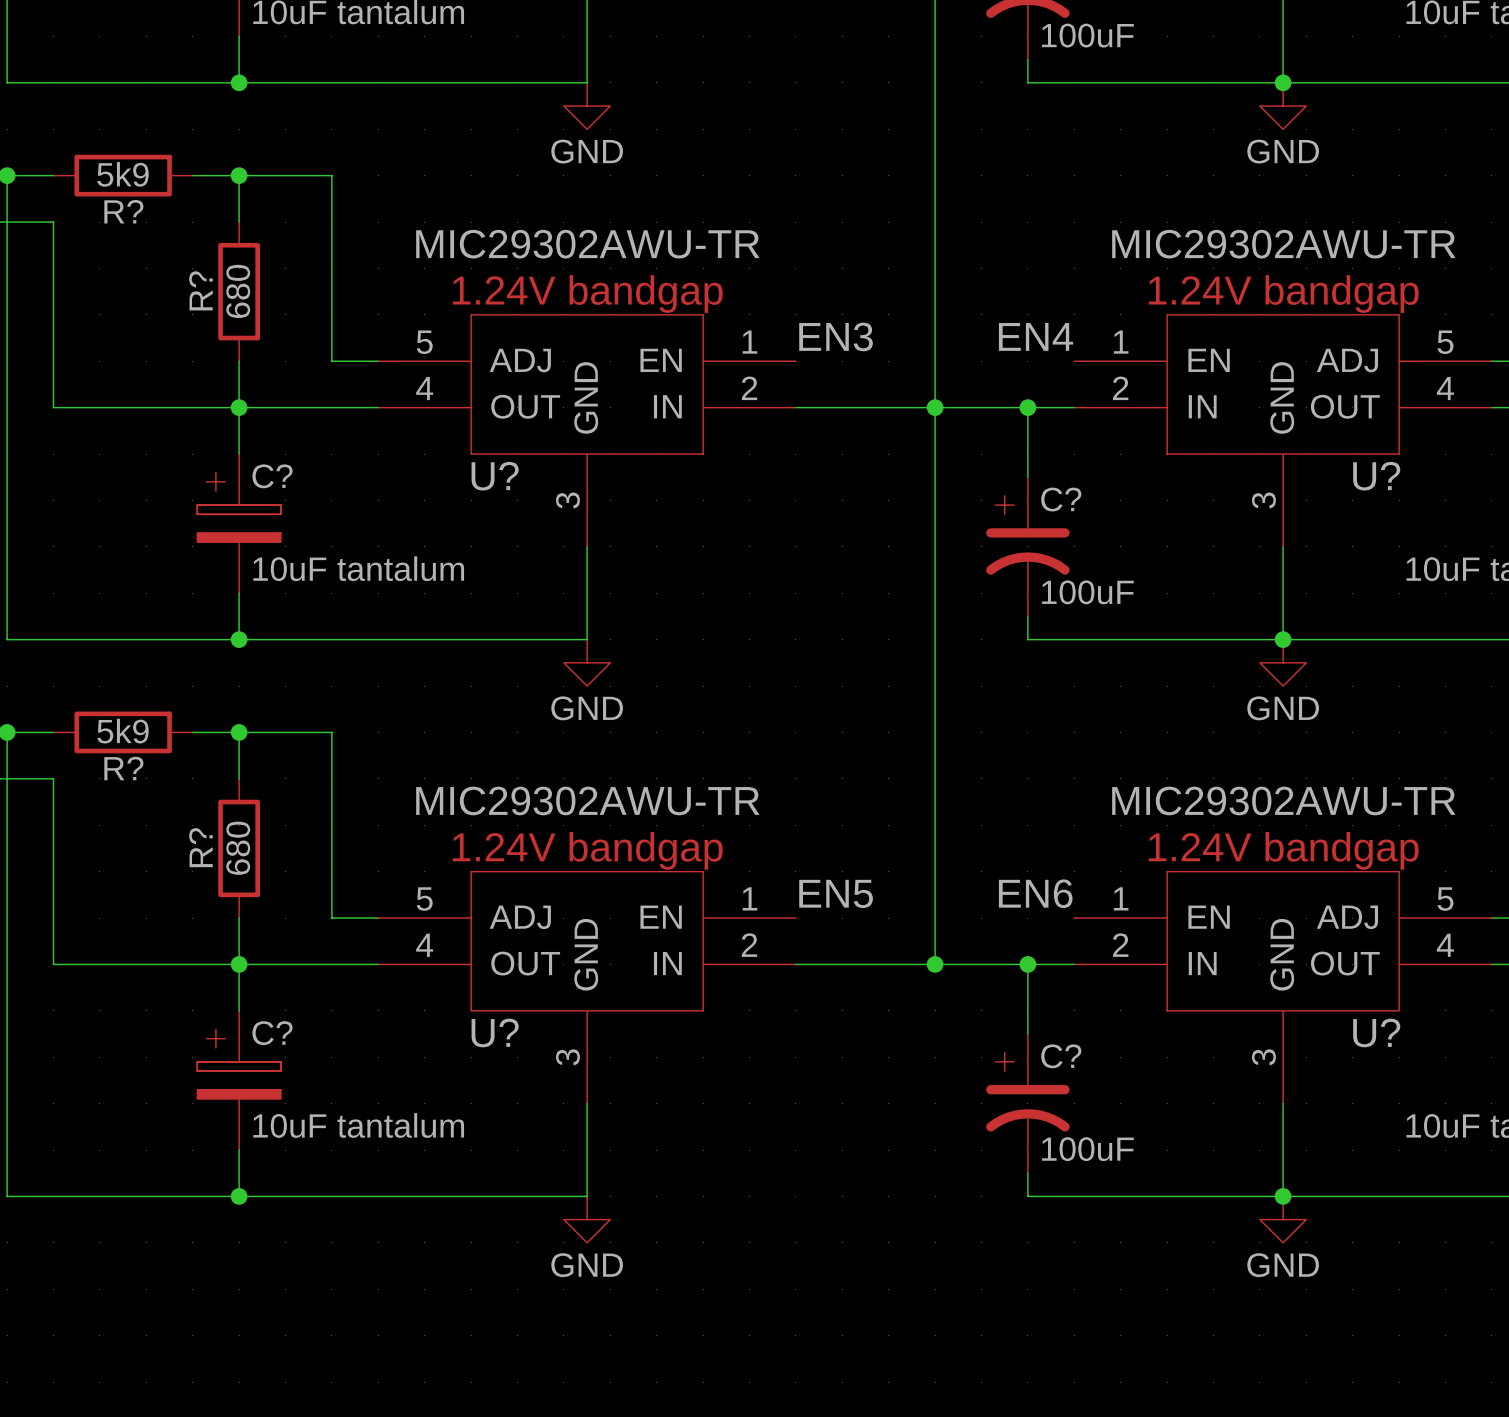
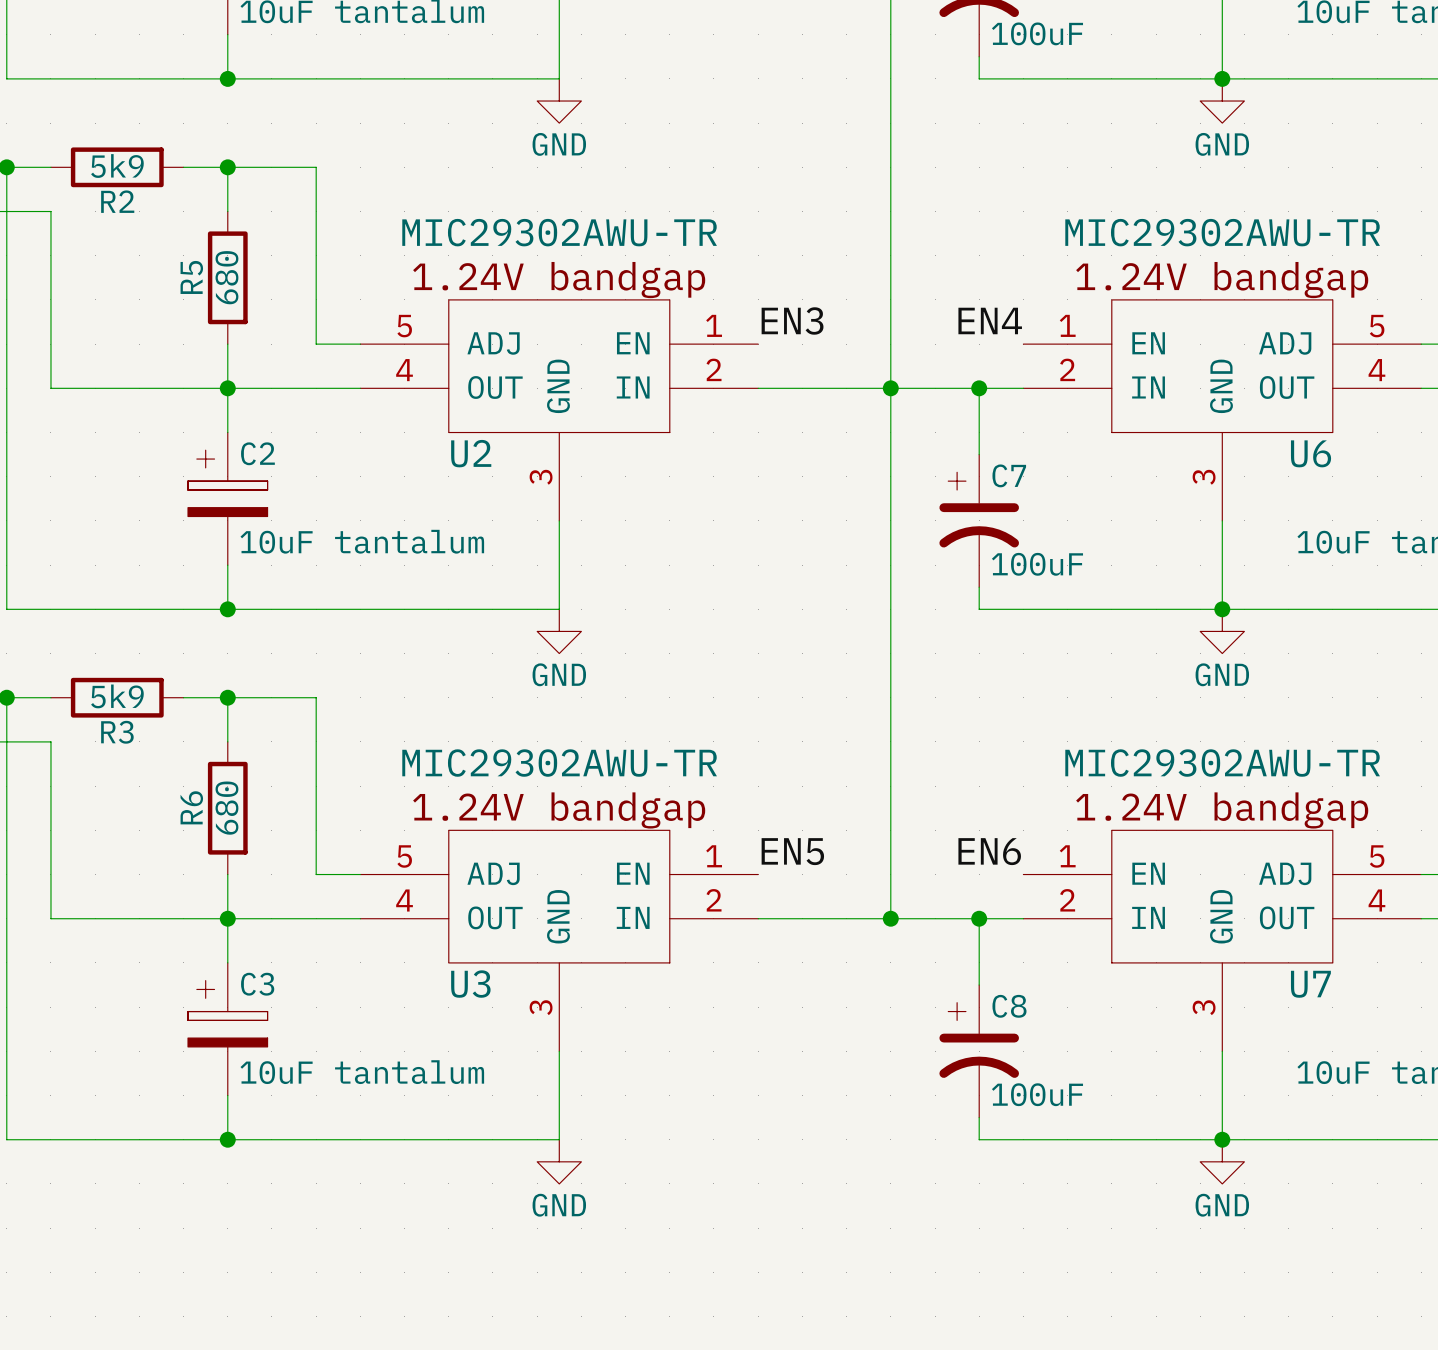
R? name: R? (123, 211) -> R2 (117, 201)
R? name: R? (200, 290) -> R5 (191, 277)
C? name: C? (272, 476) -> C2 (257, 453)
U? name: U? (495, 476) -> U2 (471, 453)
U? name: U? (1376, 476) -> U6 (1311, 453)
C? name: C? (1061, 499) -> C7 (1009, 475)
R? name: R? (123, 768) -> R3 (117, 732)
R? name: R? (200, 847) -> R6 (191, 807)
U? name: U? (495, 1032) -> U3 (470, 984)
U? name: U? (1376, 1032) -> U7 (1310, 984)
C? name: C? (272, 1033) -> C3 (257, 984)
C? name: C? (1061, 1056) -> C8 (1009, 1006)

